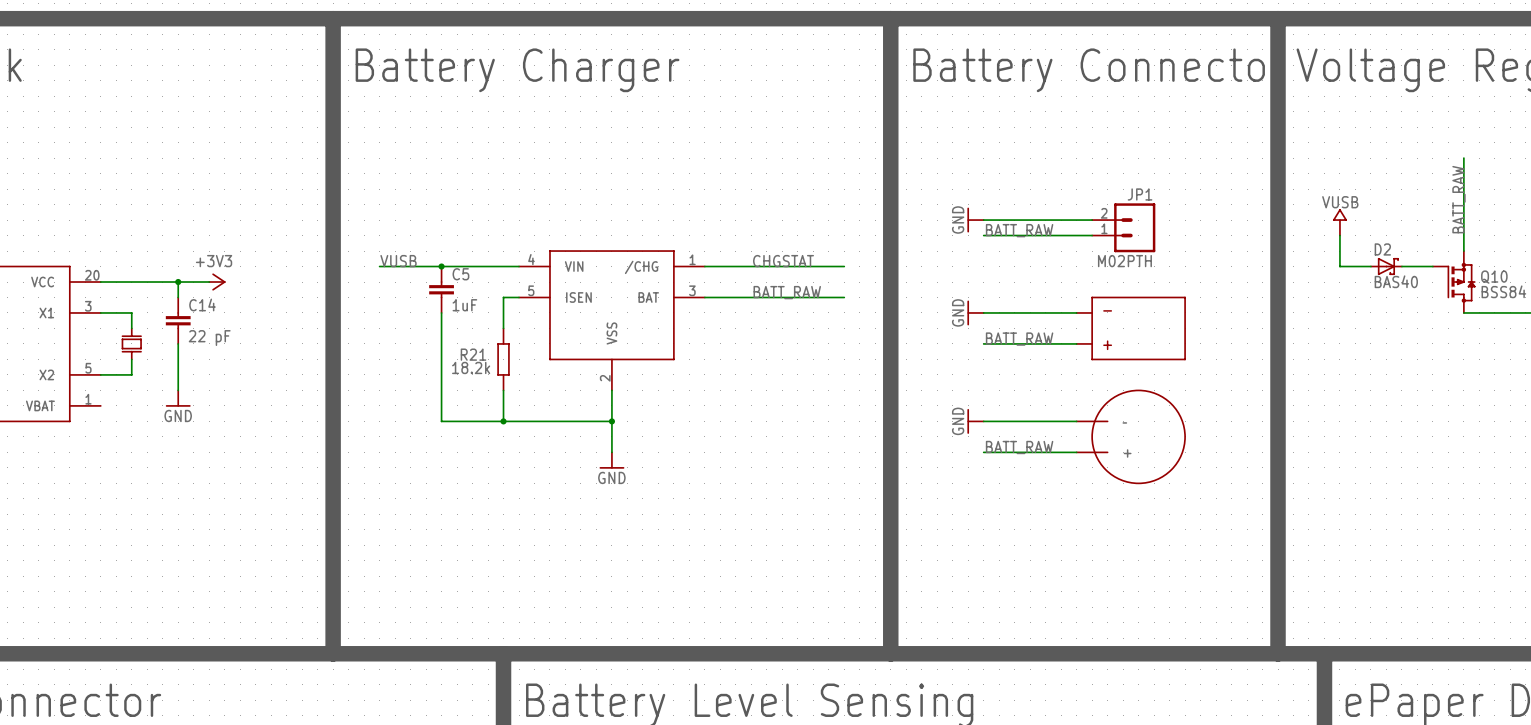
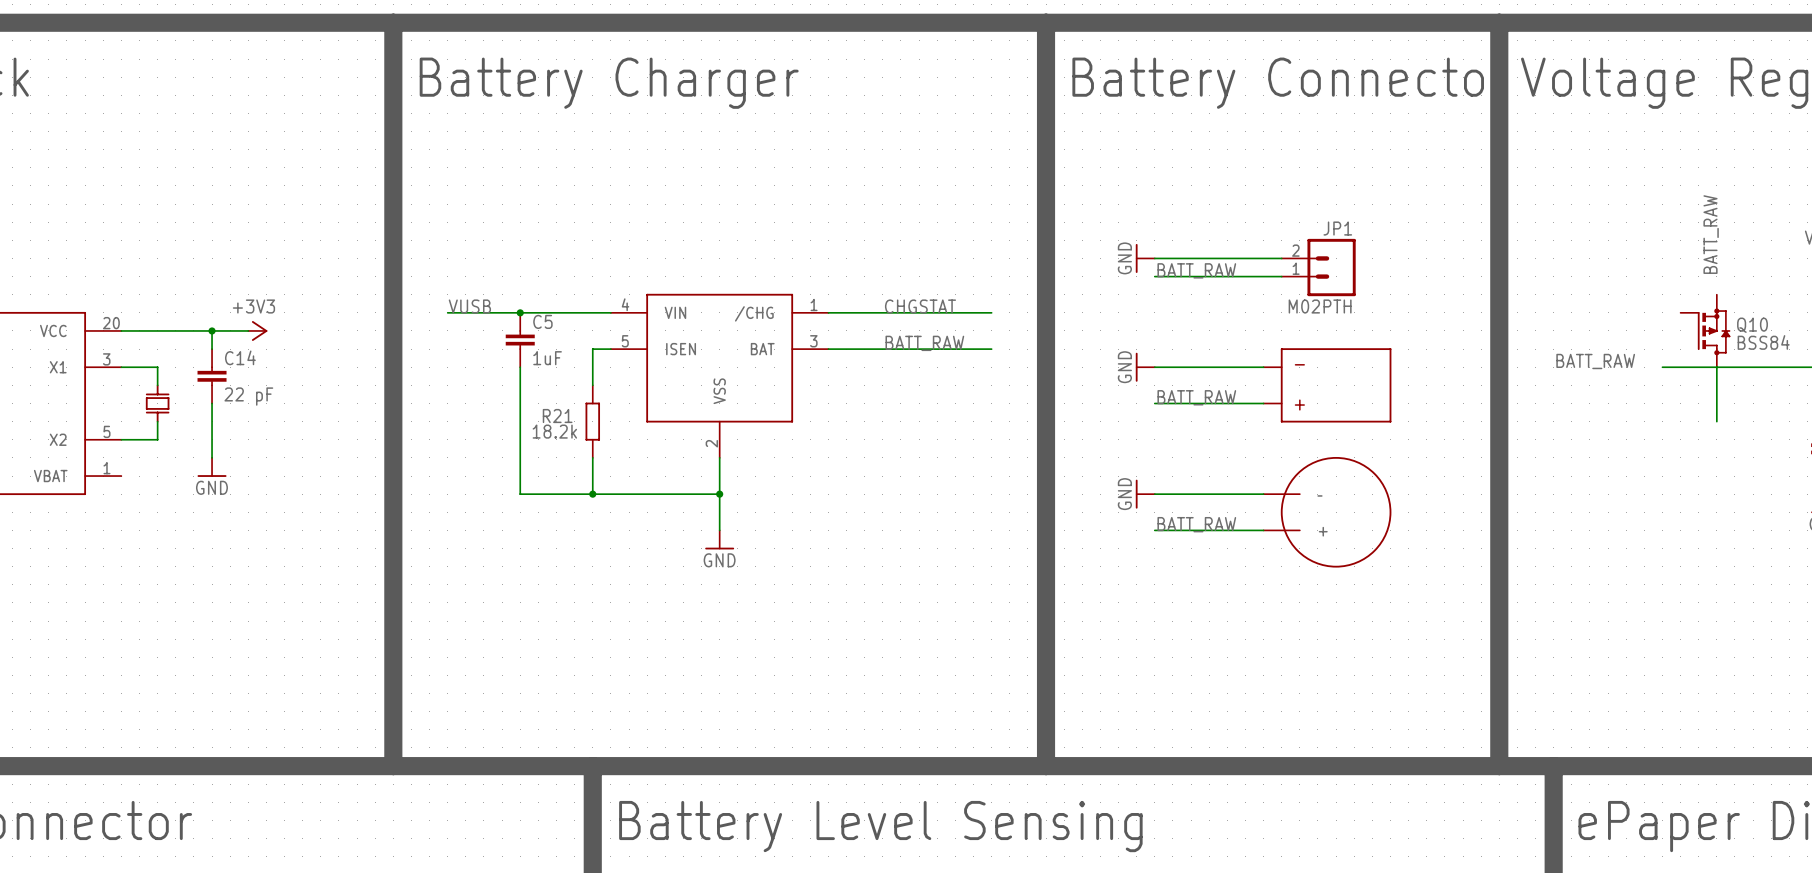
wire: (1463, 158) (1463, 251) -> none
power symbol: VUSB (1339, 222) -> none
wire: (1339, 235) (1339, 266) (1370, 266) -> none
D2: BAS40 (1386, 266) -> none
wire: (1401, 266) (1432, 266) -> none
label: none -> BATT_RAW (1595, 361)
wire: none -> (1662, 367) (1716, 367) (1716, 421)

